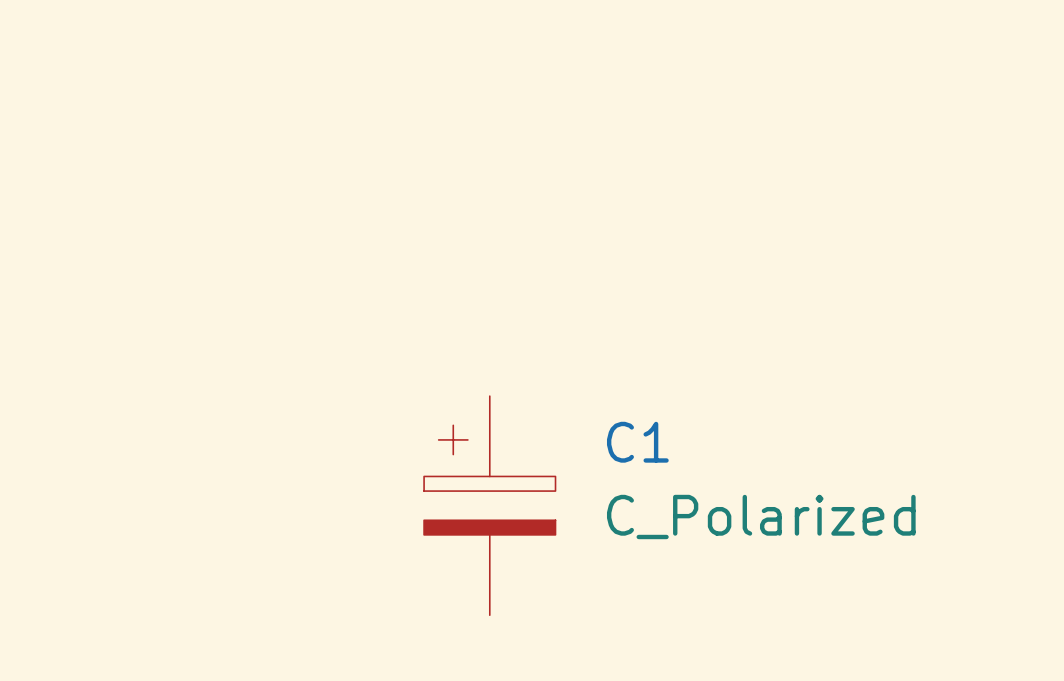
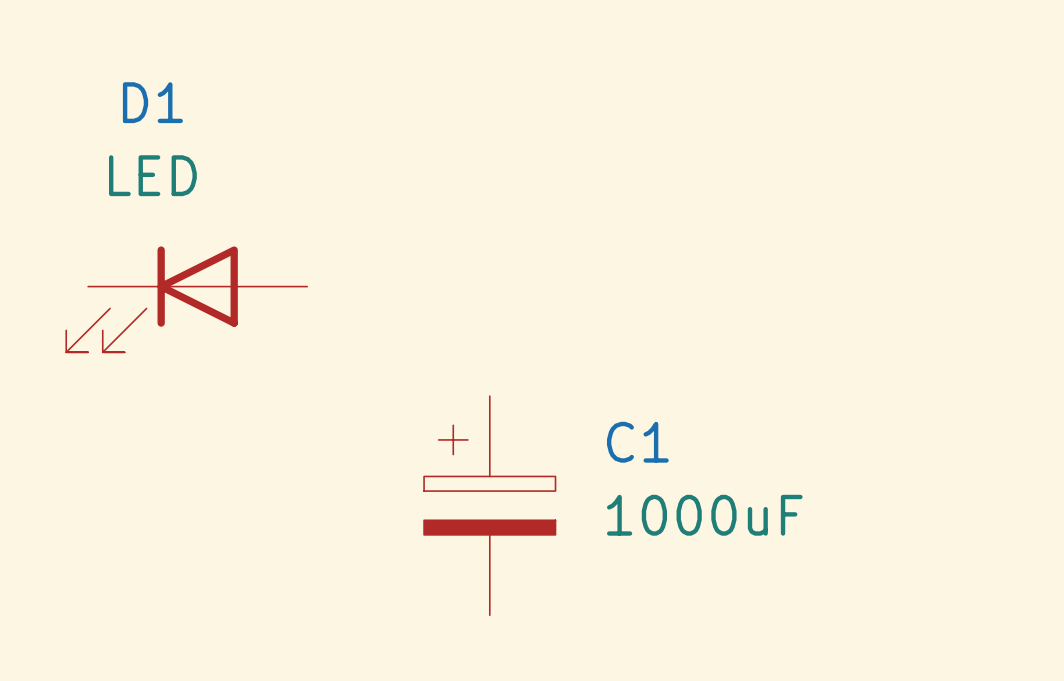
D1: none -> LED (186, 299)
C1 value: C_Polarized (761, 517) -> 1000uF (704, 515)

